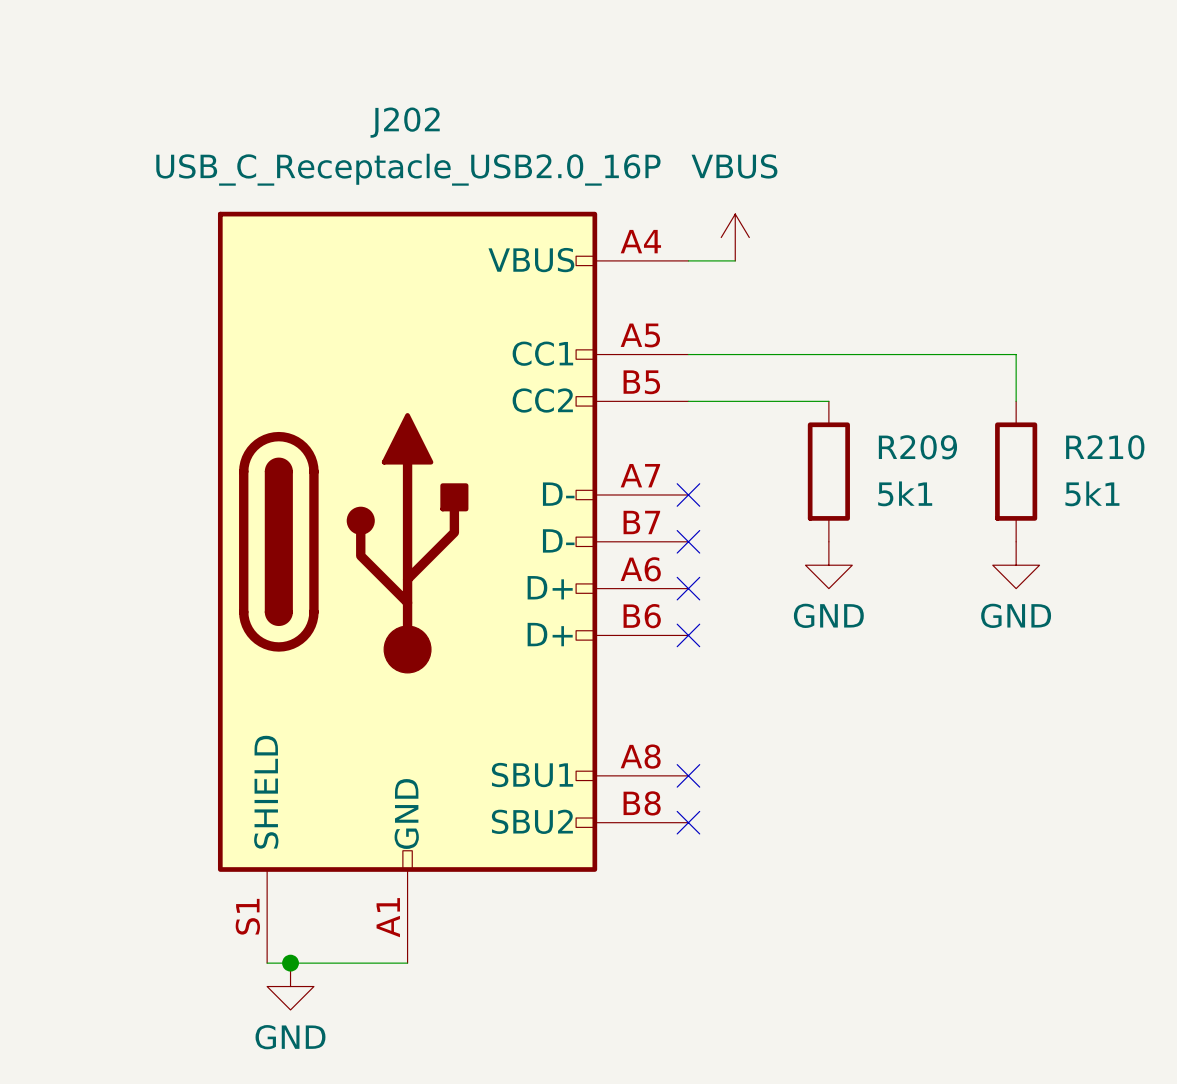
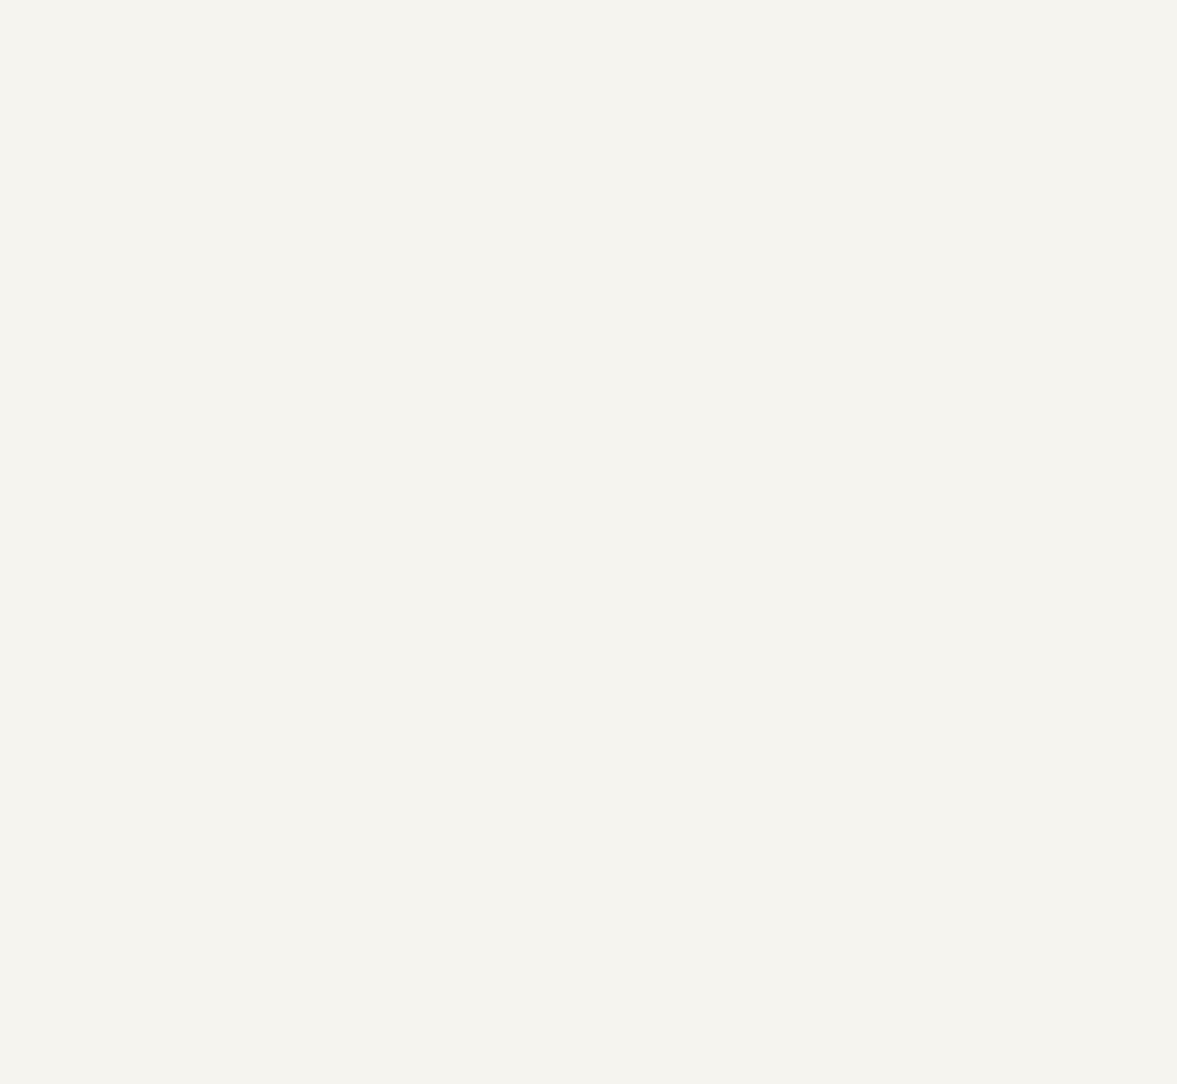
power symbol: VBUS (735, 237) -> none
wire: (688, 260) (735, 260) -> none
wire: (688, 354) (1016, 354) (1016, 401) -> none
wire: (688, 401) (828, 401) -> none
R209: 5k1 (828, 471) -> none
R210: 5k1 (1016, 471) -> none
no-connect mark: (688, 494) -> none
no-connect mark: (688, 541) -> none
power symbol: GND (828, 565) -> none
power symbol: GND (1016, 565) -> none
J202: USB_C_Receptacle_USB2.0_16P (453, 587) -> none
no-connect mark: (688, 588) -> none
no-connect mark: (688, 635) -> none
no-connect mark: (688, 775) -> none
no-connect mark: (688, 822) -> none
wire: (267, 963) (407, 963) -> none
junction: (290, 963) -> none
power symbol: GND (290, 986) -> none

